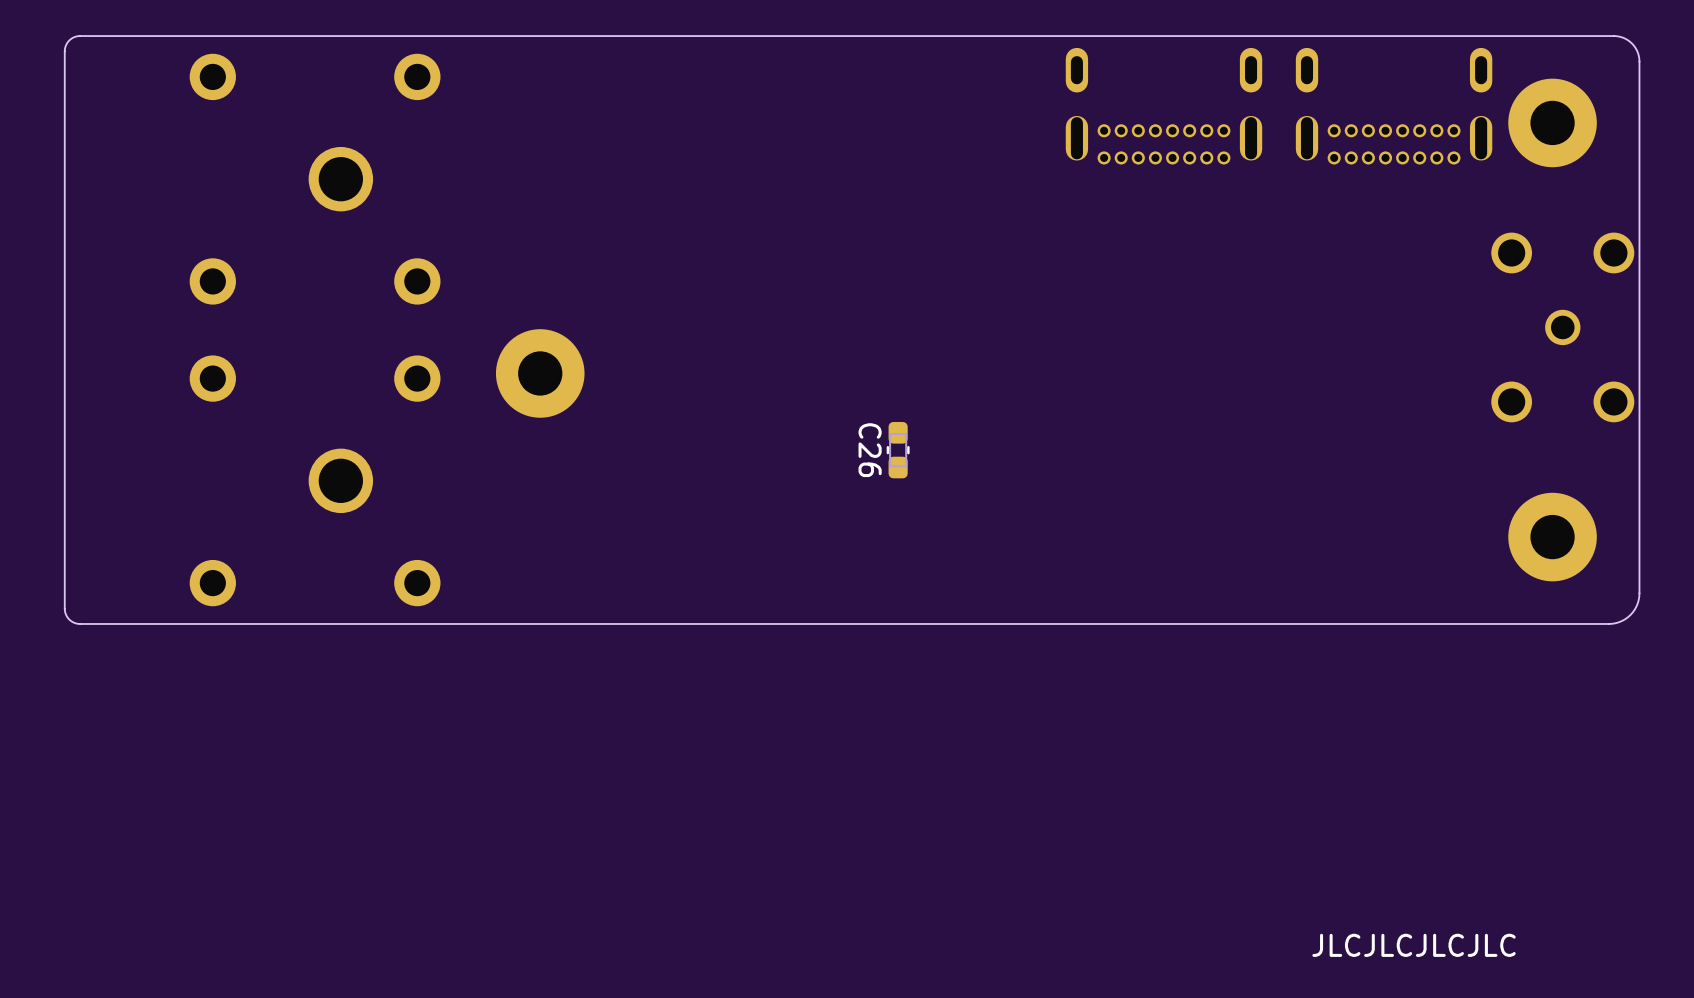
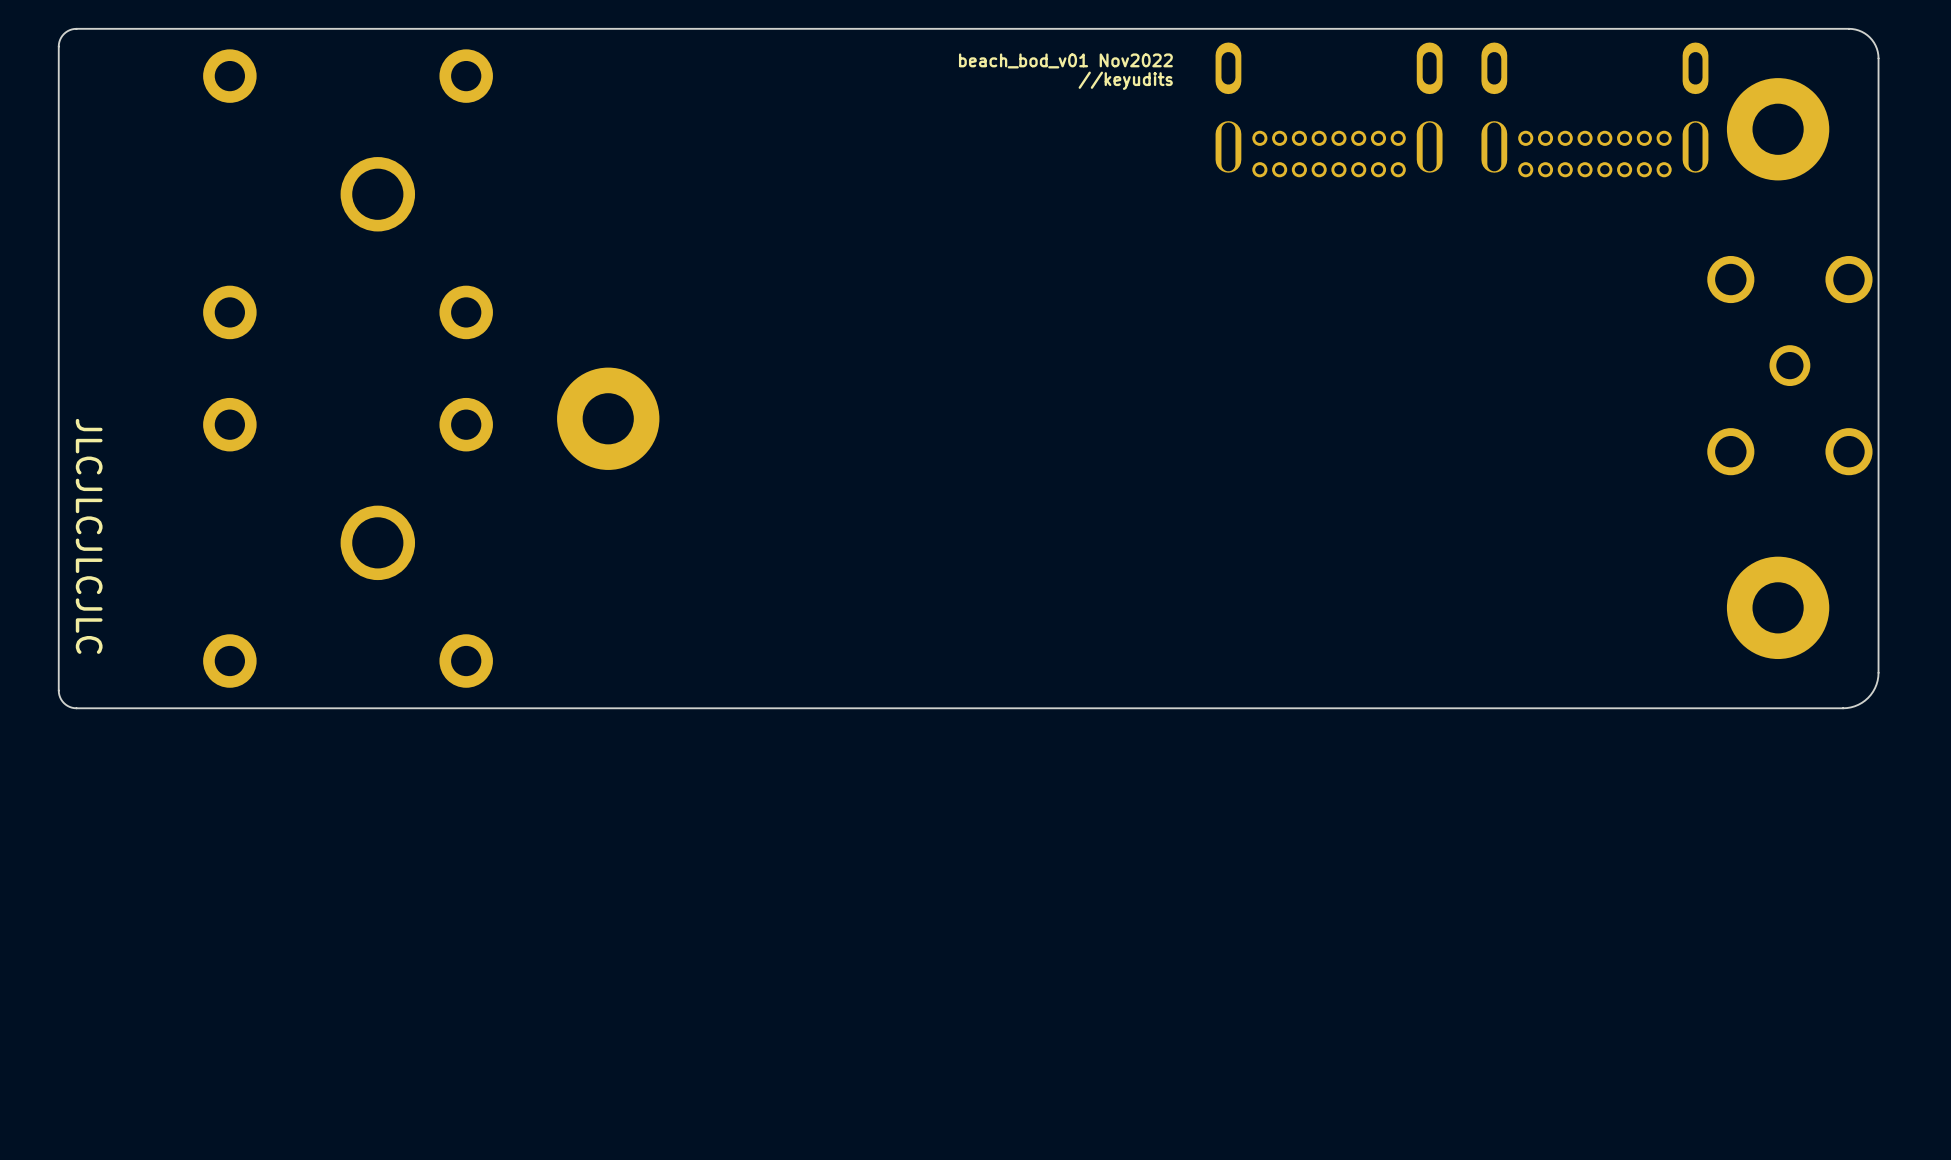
text: none -> beach_bod_v01 Nov2022 (1065, 60)
text: none -> //keyudits (1125, 80)
C26: (898, 450) -> none
text: none -> JLCJLCJLCJLC (89, 536)
text: JLCJLCJLCJLC (1414, 945) -> none

